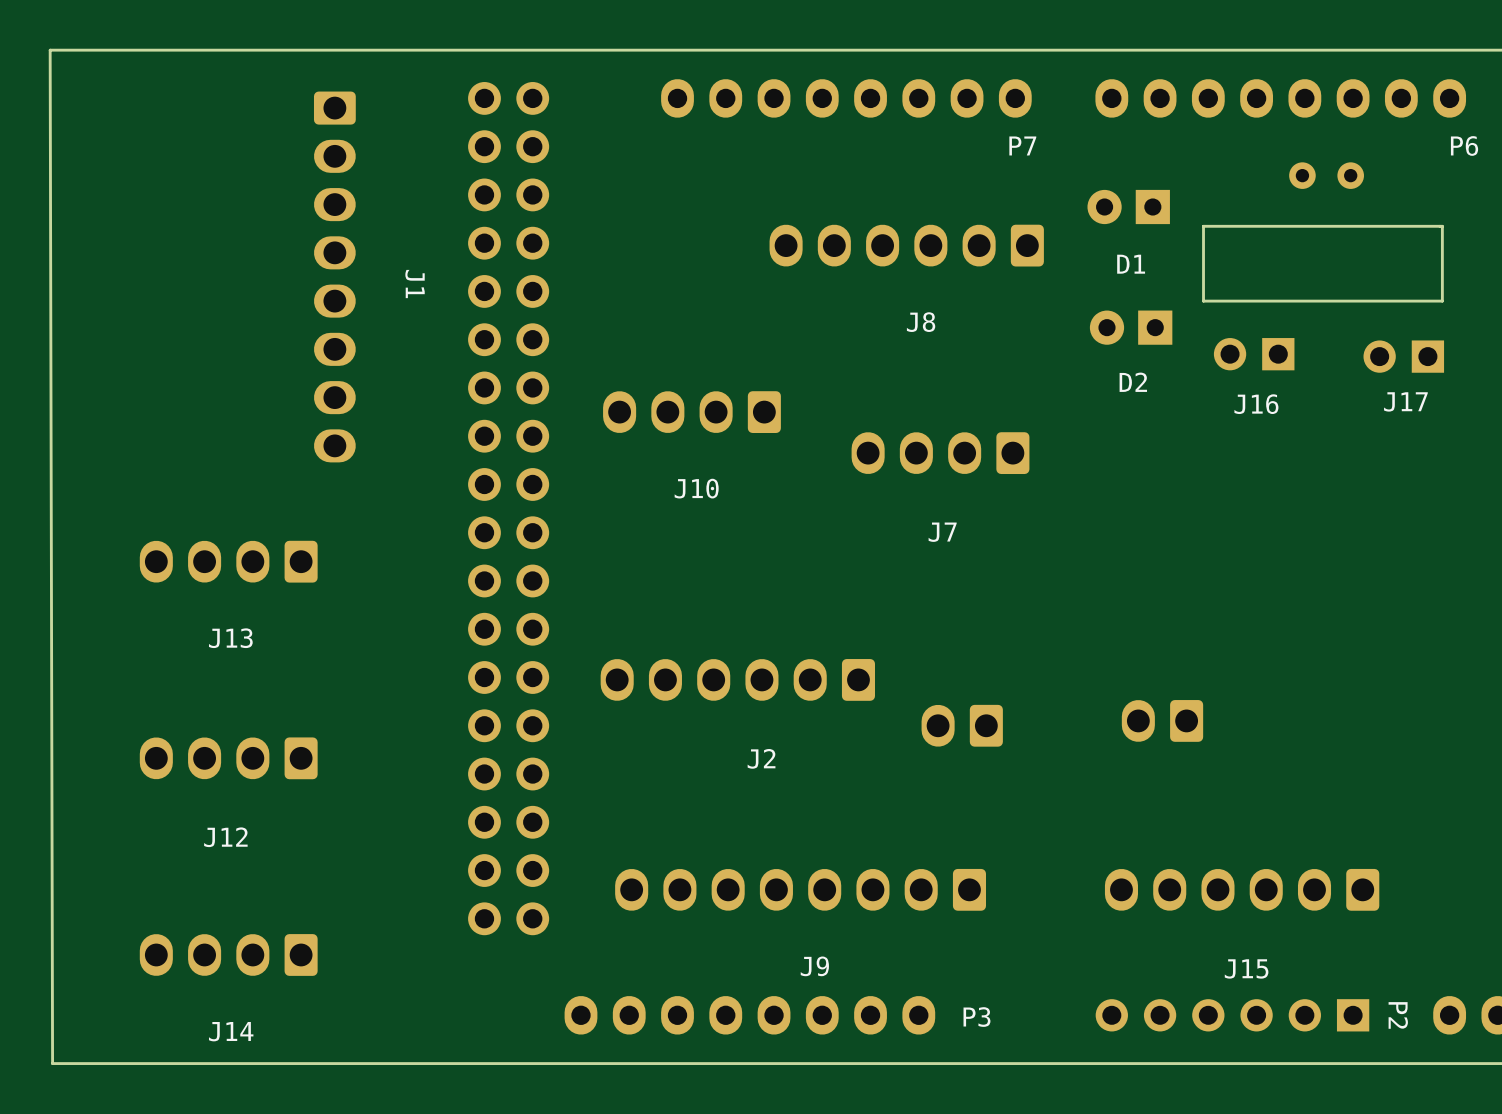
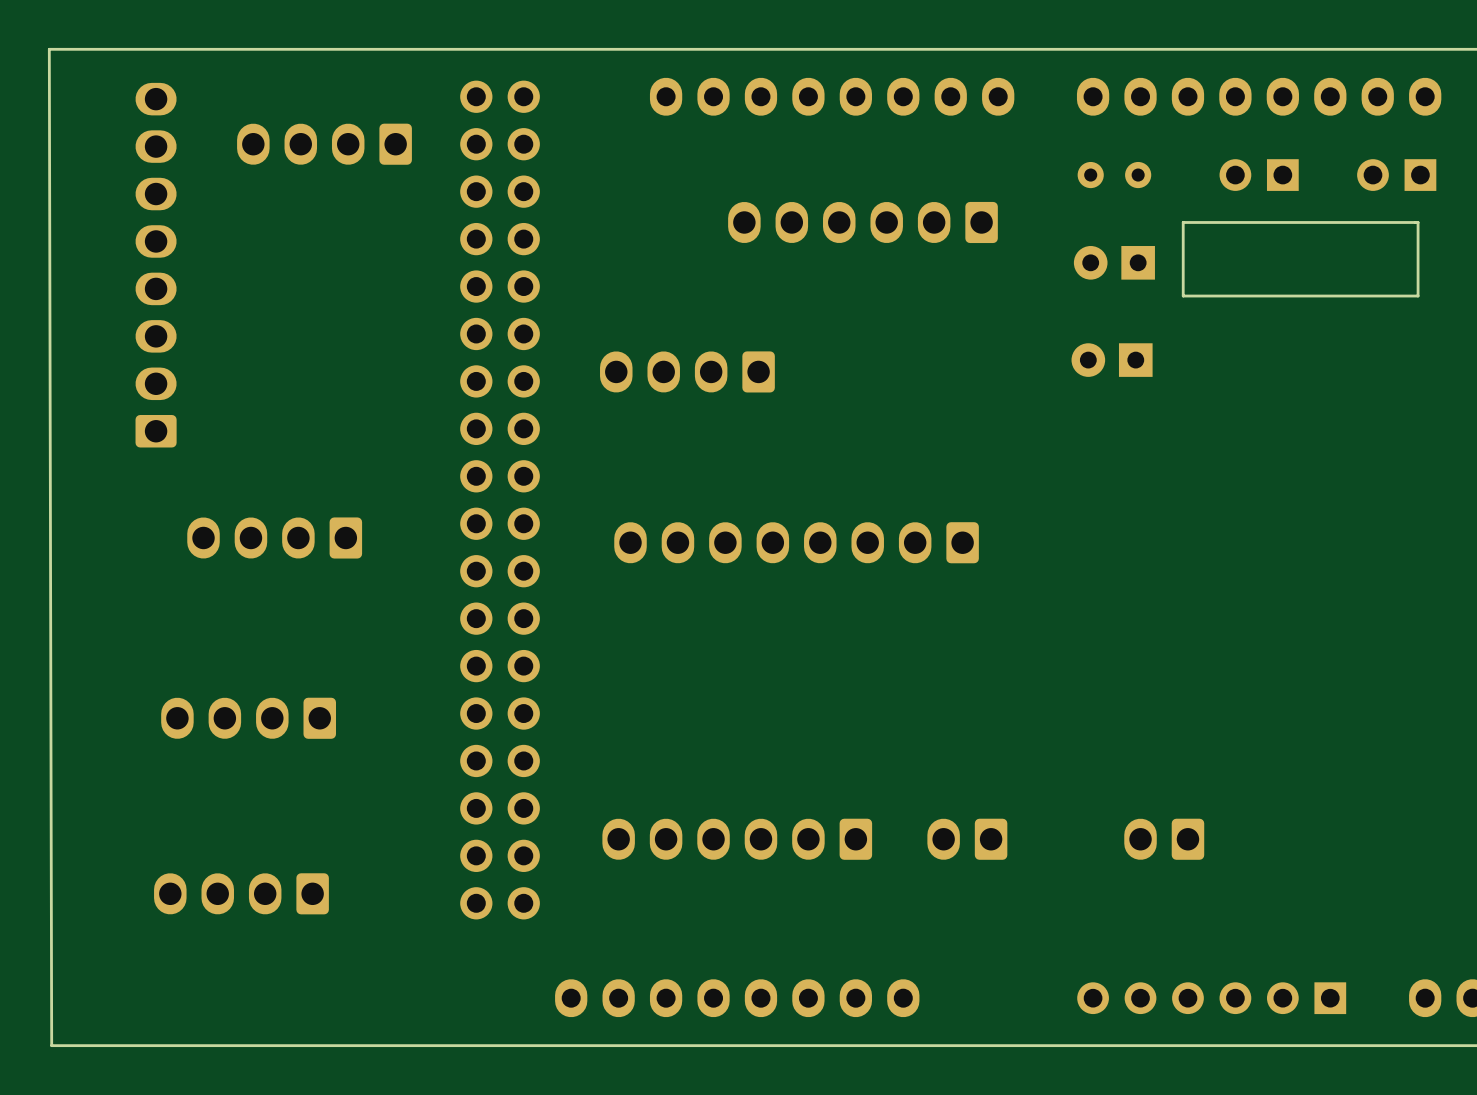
P7 name: P7 (1022, 145) -> none
P6 name: P6 (1464, 145) -> none
part: none -> (324, 144)
part position: (1326, 175) -> (1114, 175)
part: none -> (1259, 175)
part: none -> (1396, 175)
D1: (1128, 207) -> none
part: none -> (862, 222)
J8: (906, 245) -> none
part: none -> (1114, 262)
part: none -> (156, 265)
J1: (334, 276) -> none
D2: (1131, 327) -> none
J16: (1254, 354) -> none
J17: (1403, 356) -> none
part: none -> (1112, 360)
part: none -> (687, 371)
J10: (691, 412) -> none
J7: (940, 453) -> none
part: none -> (274, 537)
part: none -> (796, 542)
J13: (228, 561) -> none
J2: (737, 679) -> none
part: (1162, 720) -> none
part: (962, 725) -> none
part: none -> (248, 718)
J12: (228, 758) -> none
part: none -> (737, 839)
part: none -> (967, 839)
part: none -> (1164, 839)
J9: (800, 889) -> none
J15: (1242, 889) -> none
part: none -> (241, 893)
J14: (228, 954) -> none
P2 name: P2 (1398, 1015) -> none
P3 name: P3 (976, 1017) -> none

